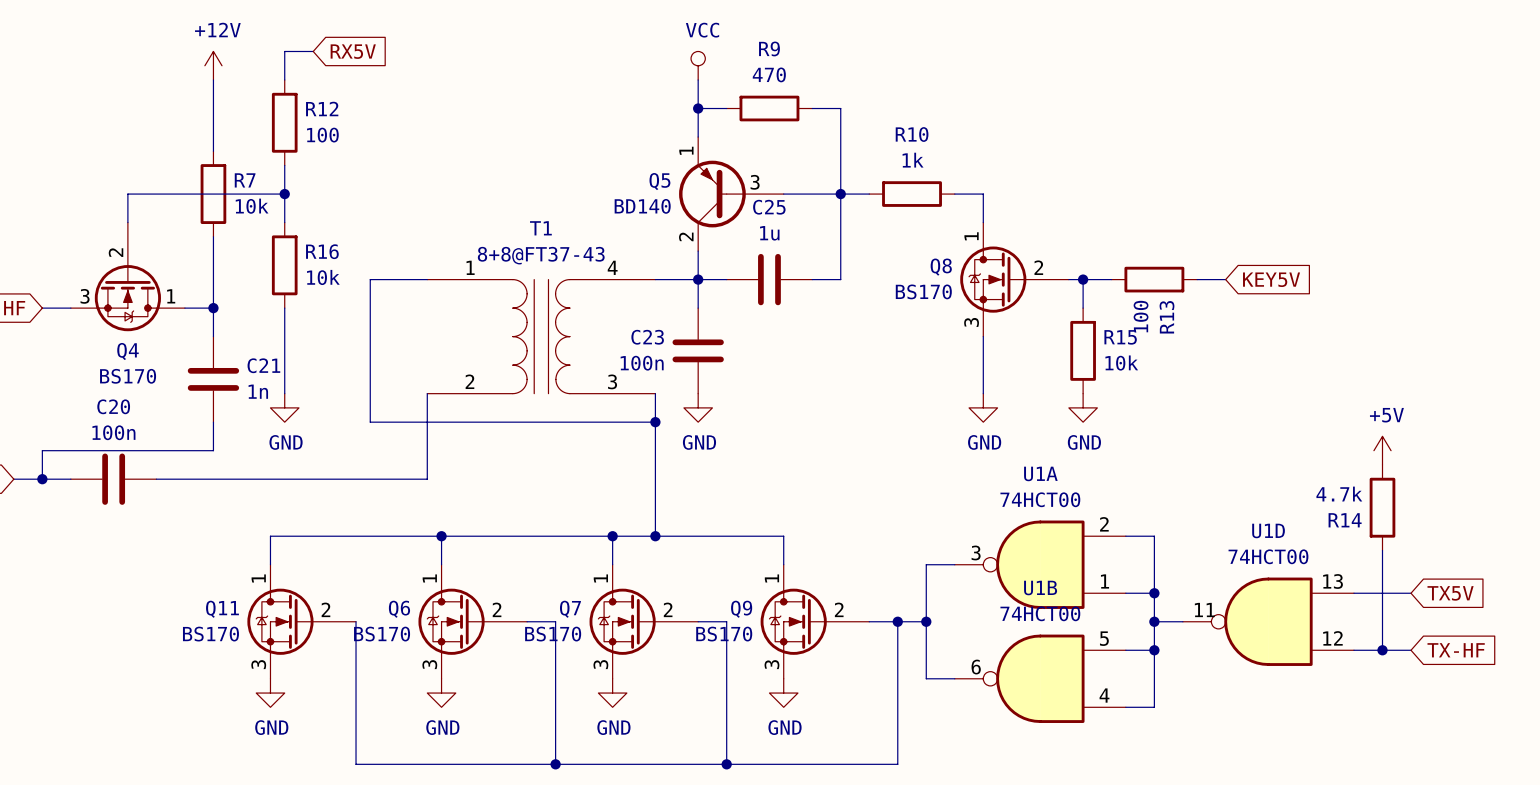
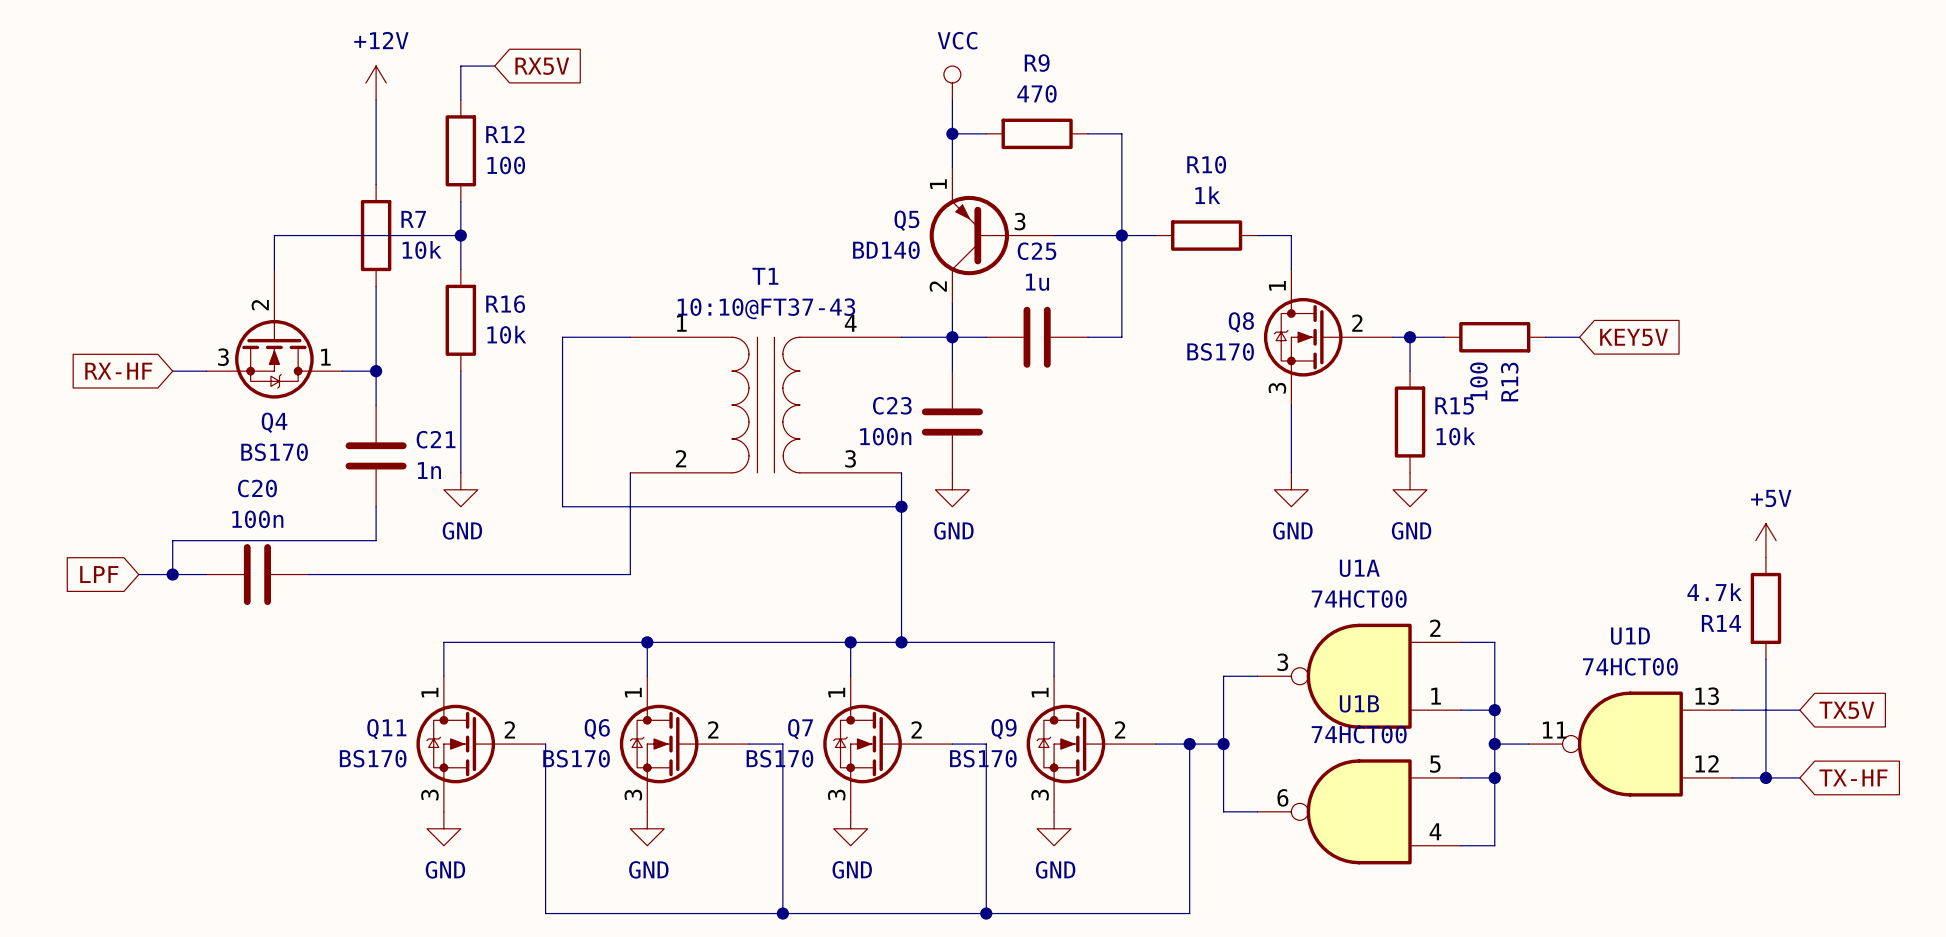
T1 value: 8+8@FT37-43 (541, 255) -> 10:10@FT37-43 (766, 308)

